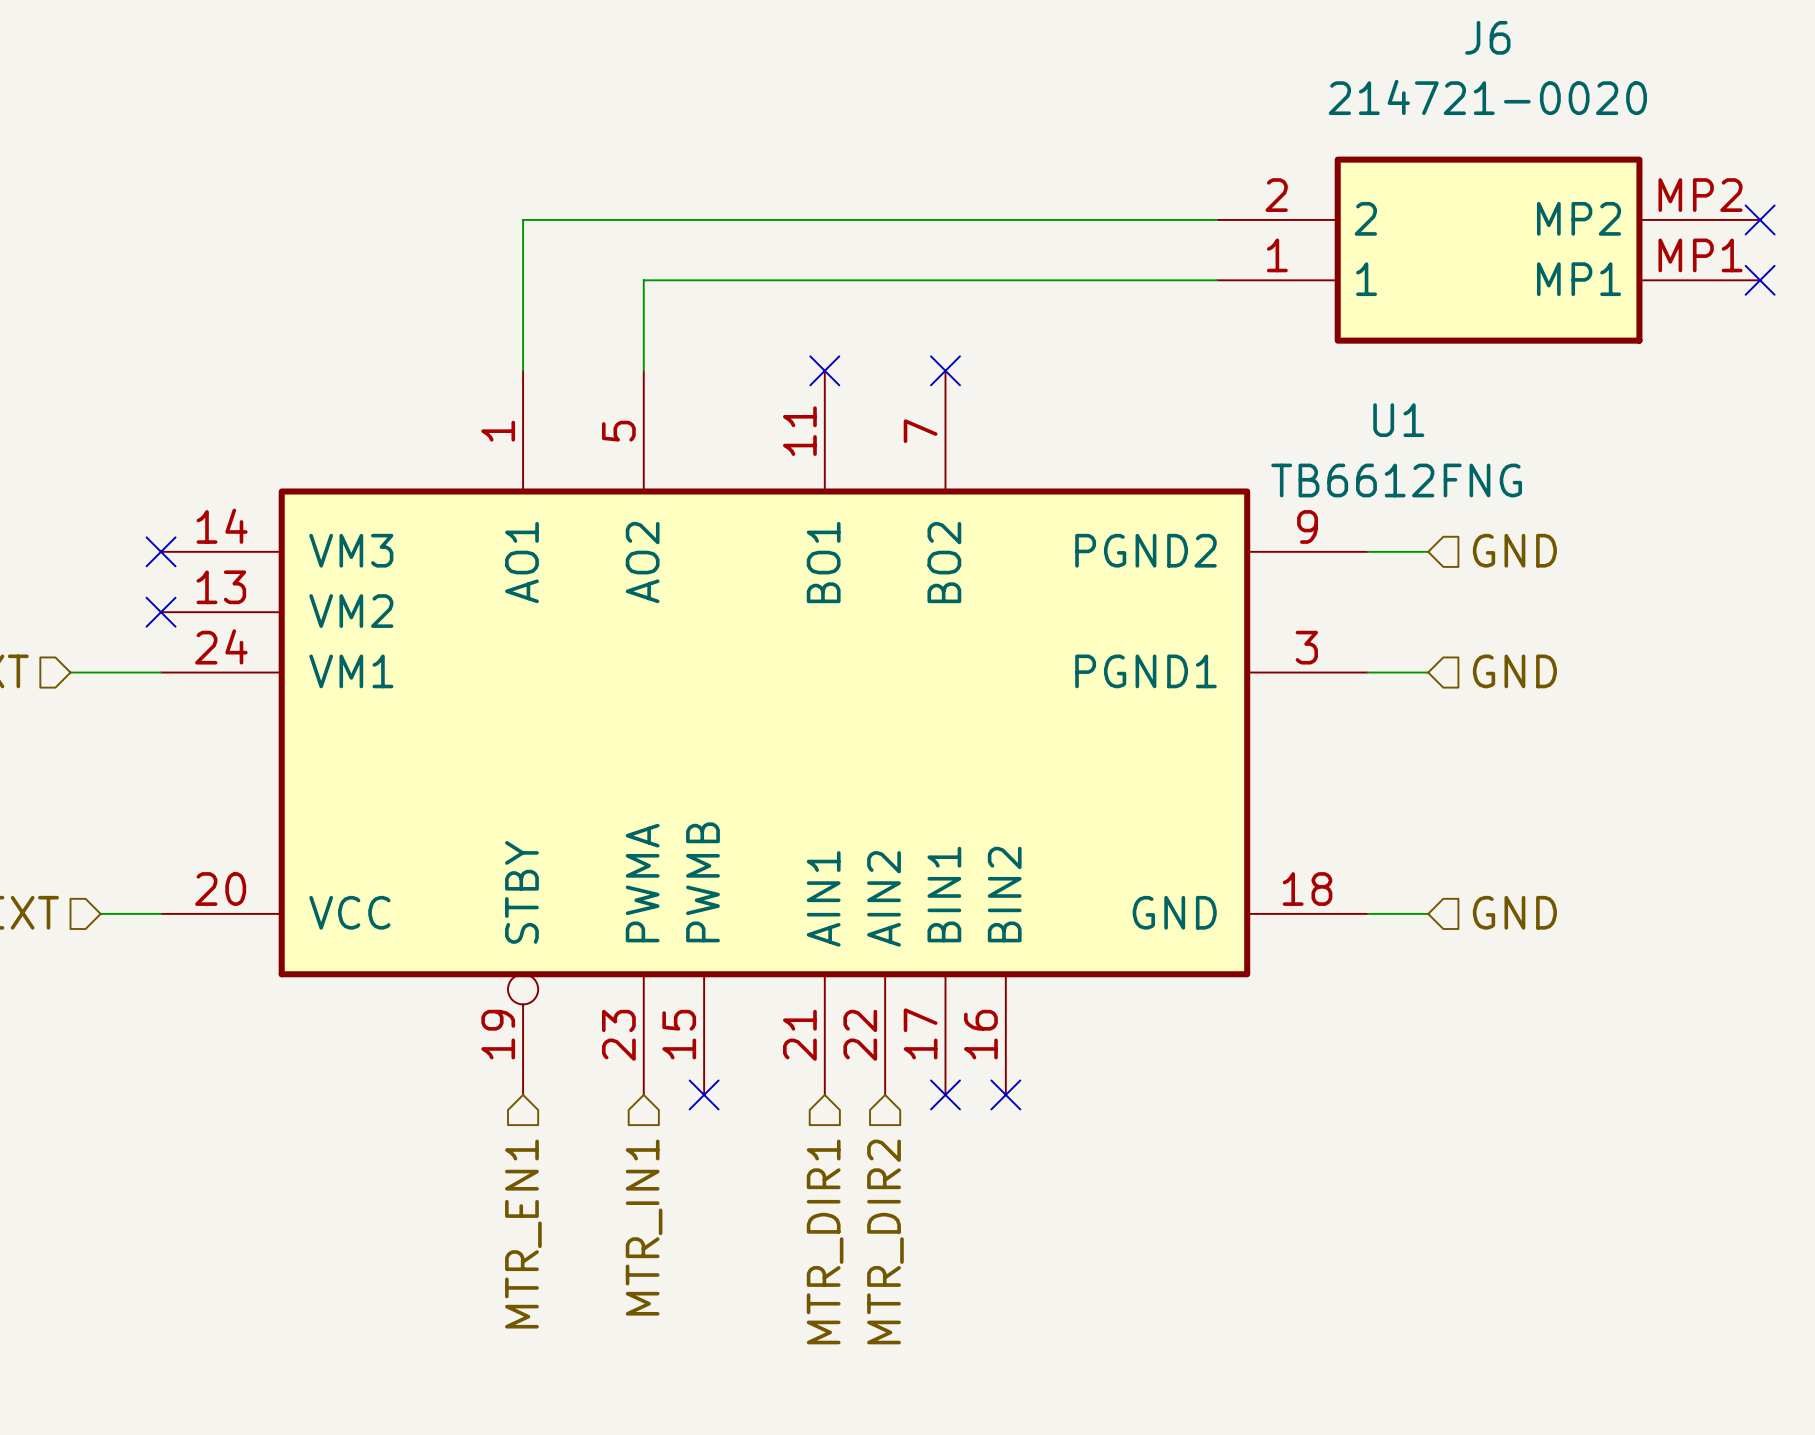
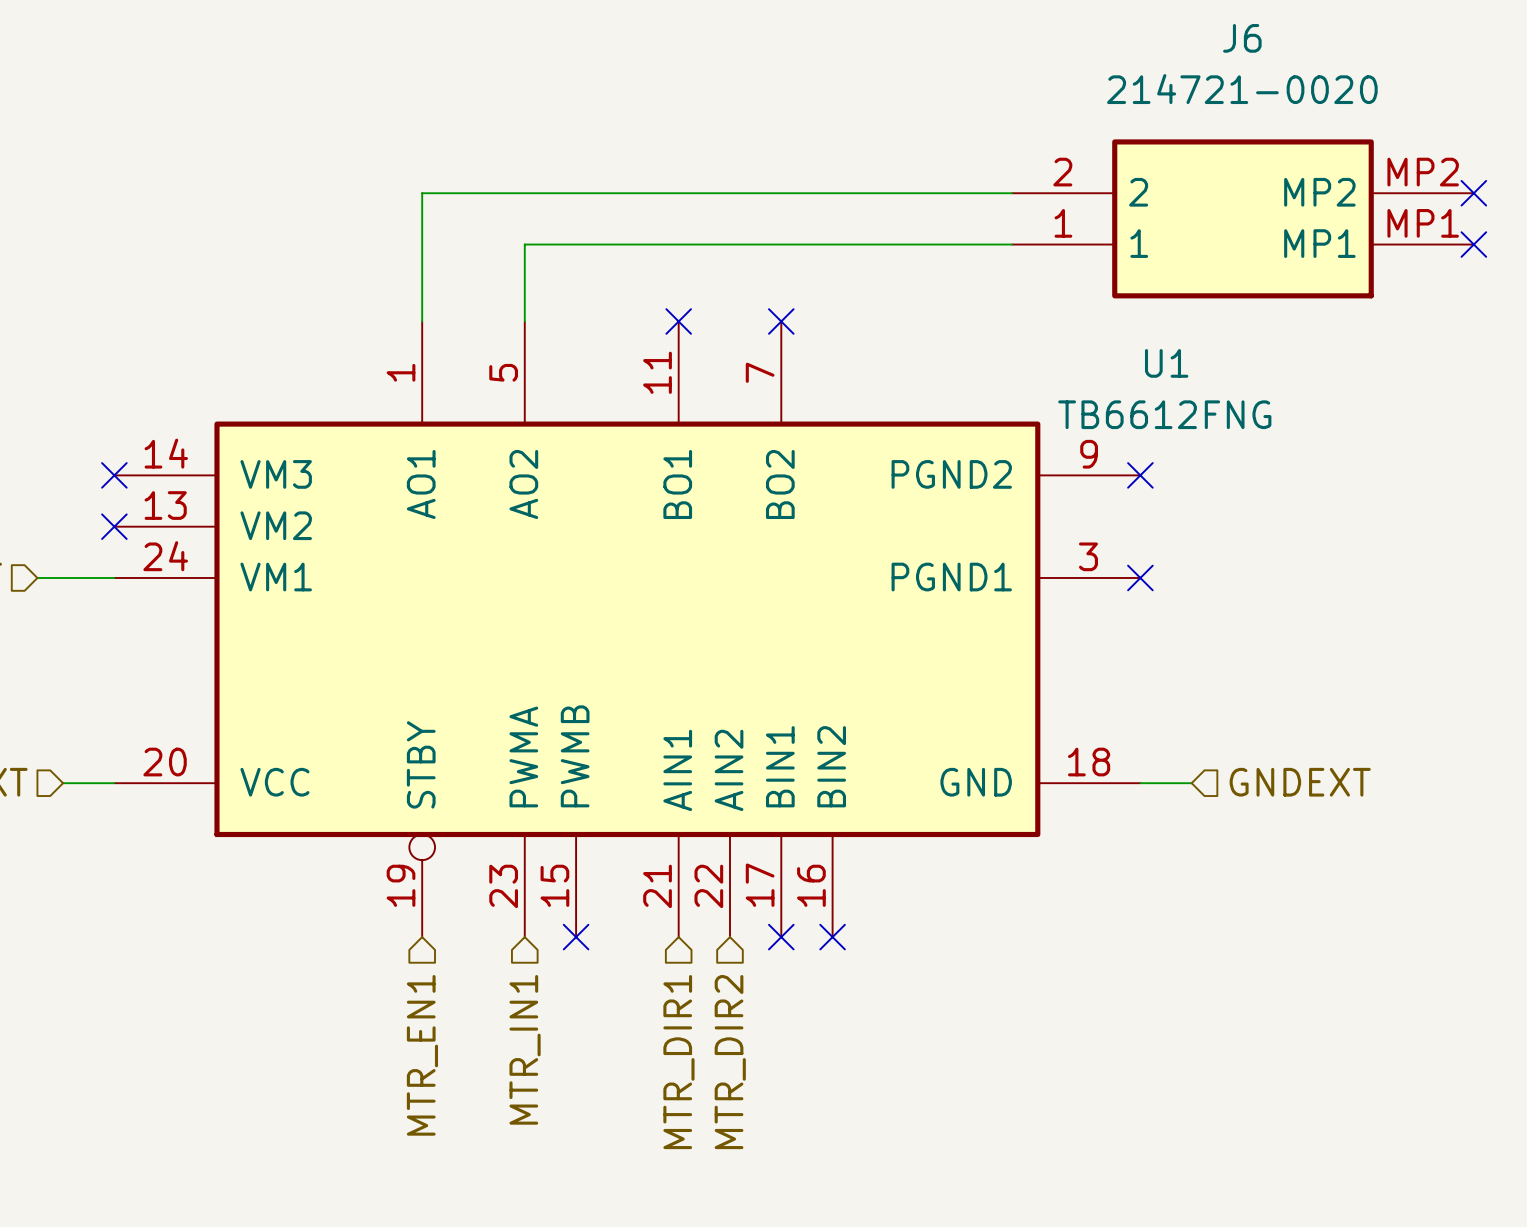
hierarchical label: GND (1514, 550) -> none
wire: (1367, 551) (1428, 551) -> none
no-connect mark: none -> (1140, 475)
hierarchical label: GND (1514, 671) -> none
wire: (1367, 672) (1428, 672) -> none
no-connect mark: none -> (1140, 577)
hierarchical label: GND (1514, 912) -> GNDEXT (1300, 782)

